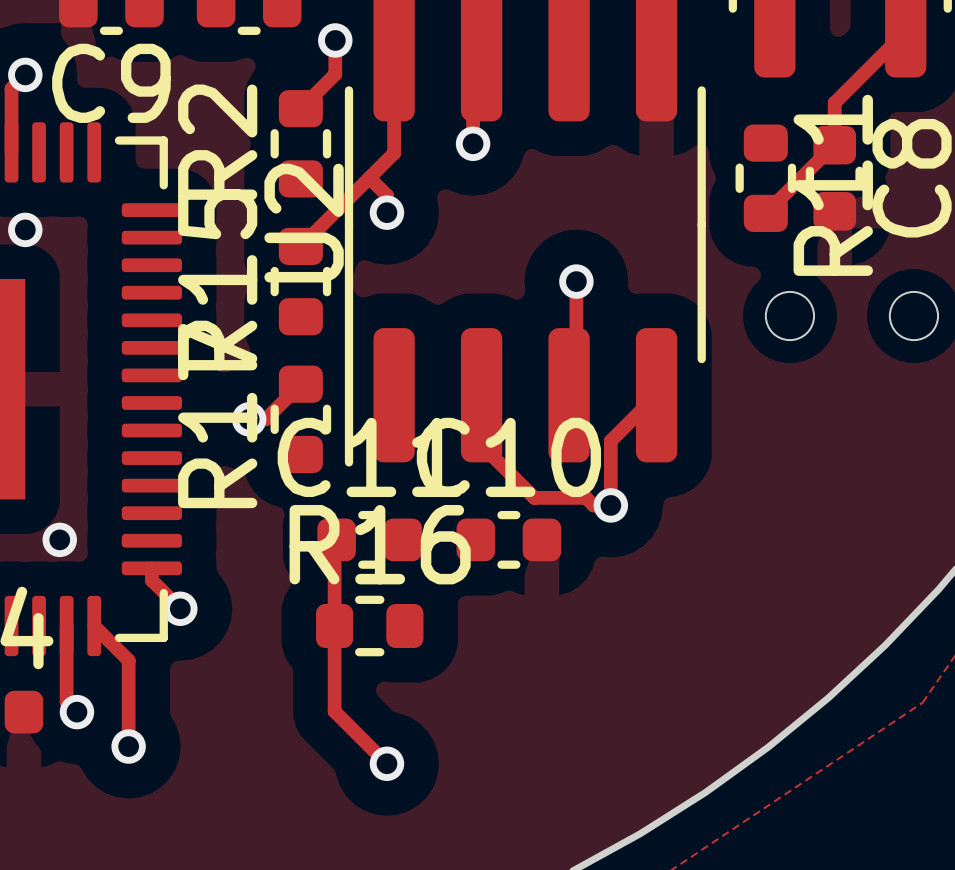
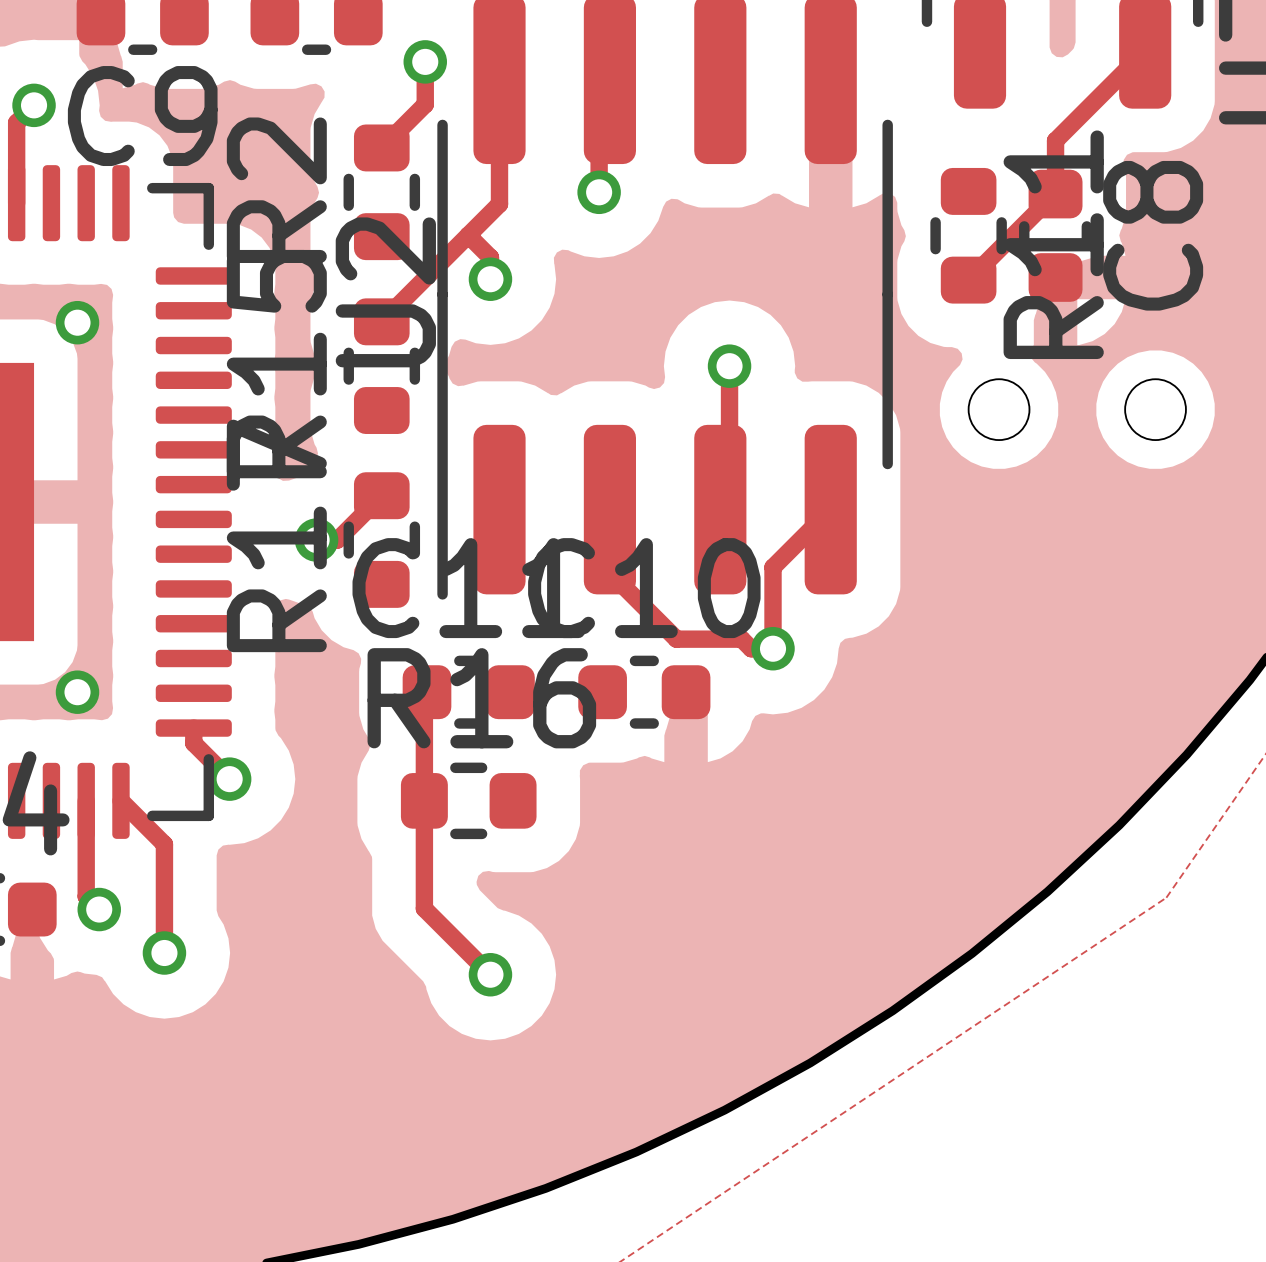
via position: (25, 229) -> (77, 322)

